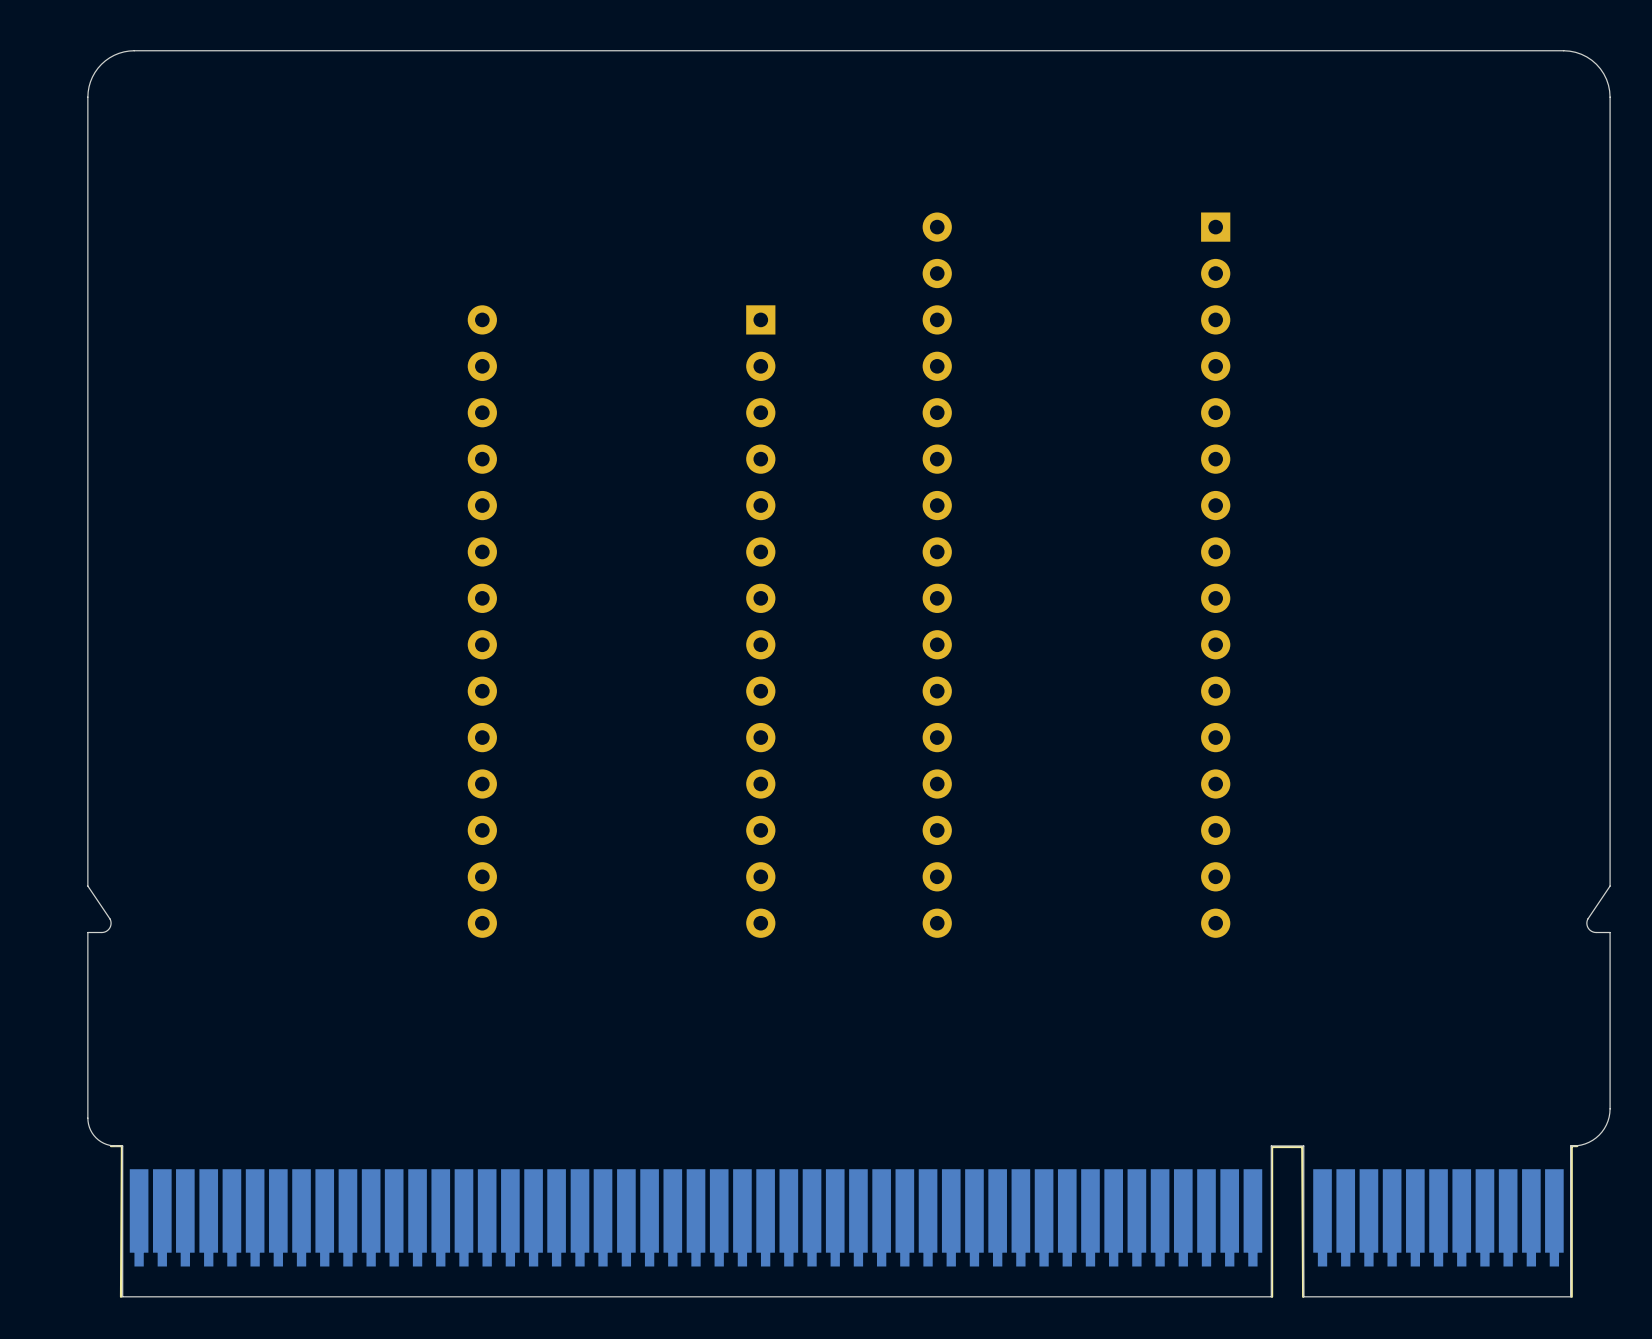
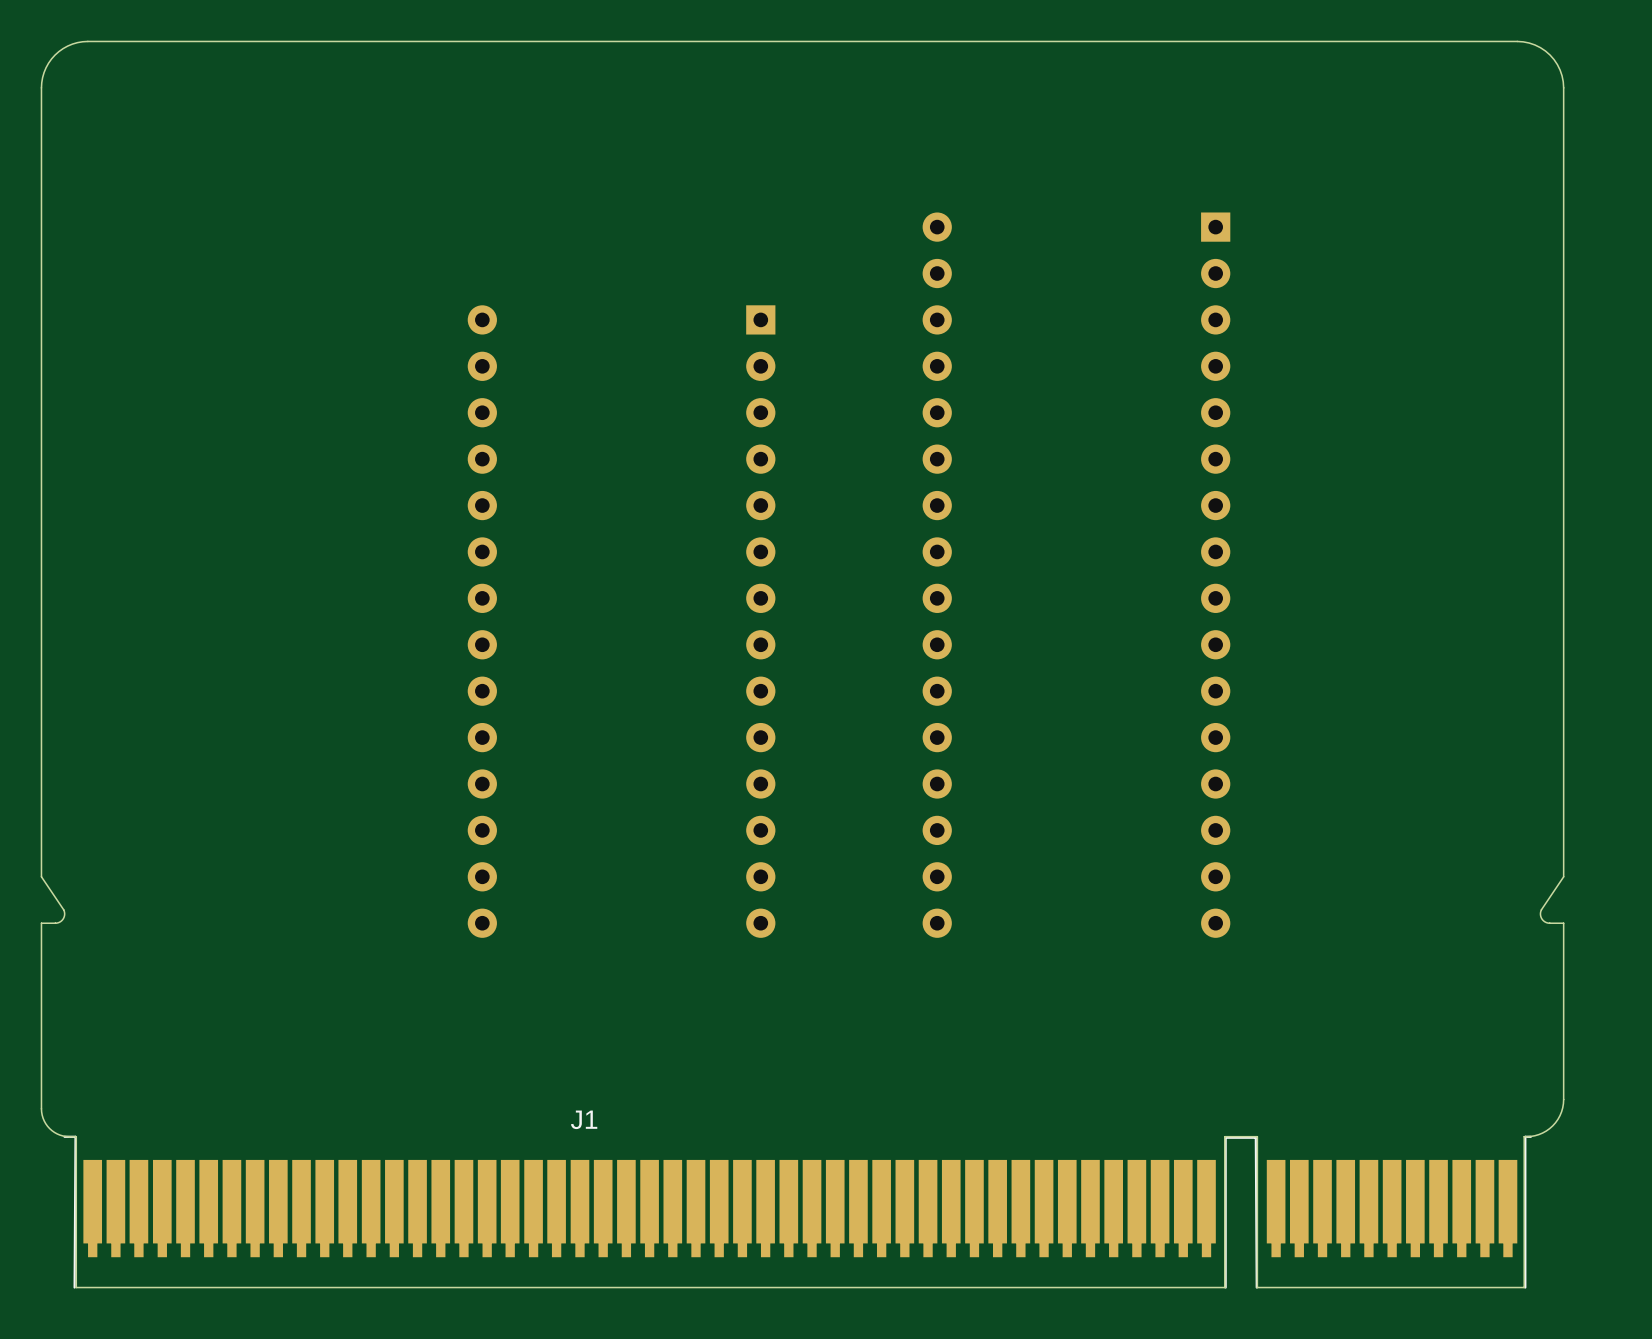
board edge: (1563, 50) (134, 50) (118, 53) (105, 60) (92, 77) (87, 97) (87, 886) (110, 919) (111, 923) (105, 931) (87, 932) (87, 1118) (90, 1130) (98, 1139) (109, 1145) (122, 1145) (122, 1296) (1271, 1296) (1271, 1145) (1303, 1145) (1303, 1296) (1570, 1296) (1570, 1145) (1585, 1143) (1599, 1135) (1606, 1124) (1610, 1108) (1610, 932) (1592, 931) (1586, 923) (1587, 919) (1610, 886) (1610, 97) (1606, 79) (1596, 64) (1581, 54) (1563, 50) -> (1517, 41) (87, 41) (72, 44) (58, 51) (46, 67) (41, 87) (41, 876) (63, 909) (64, 914) (58, 922) (41, 923) (41, 1108) (44, 1120) (51, 1130) (63, 1136) (76, 1136) (76, 1287) (1224, 1287) (1224, 1136) (1257, 1136) (1257, 1287) (1524, 1287) (1524, 1136) (1538, 1134) (1552, 1125) (1561, 1111) (1563, 1099) (1563, 923) (1546, 922) (1540, 914) (1541, 909) (1563, 876) (1563, 87) (1560, 70) (1550, 55) (1535, 45) (1517, 41)
J1: none -> (797, 1212)
part: (844, 1221) -> none

